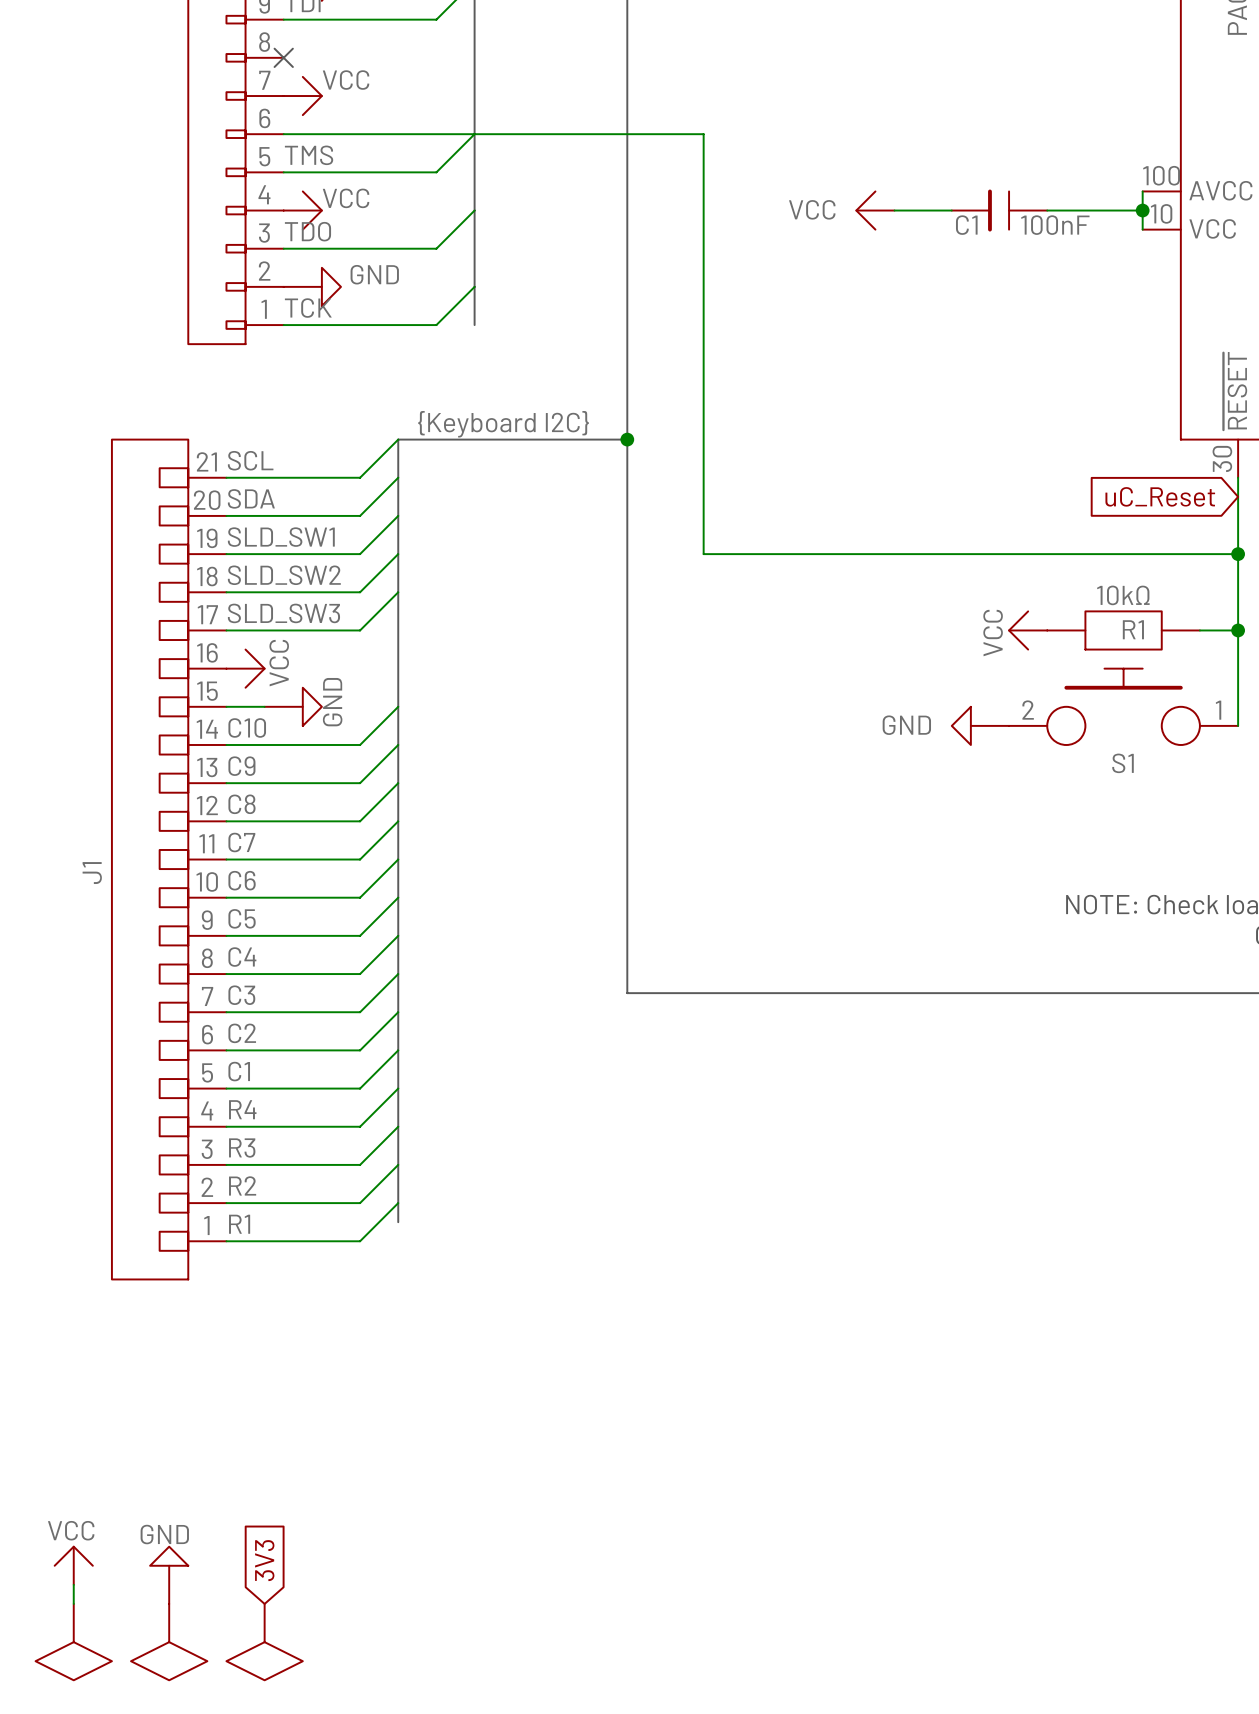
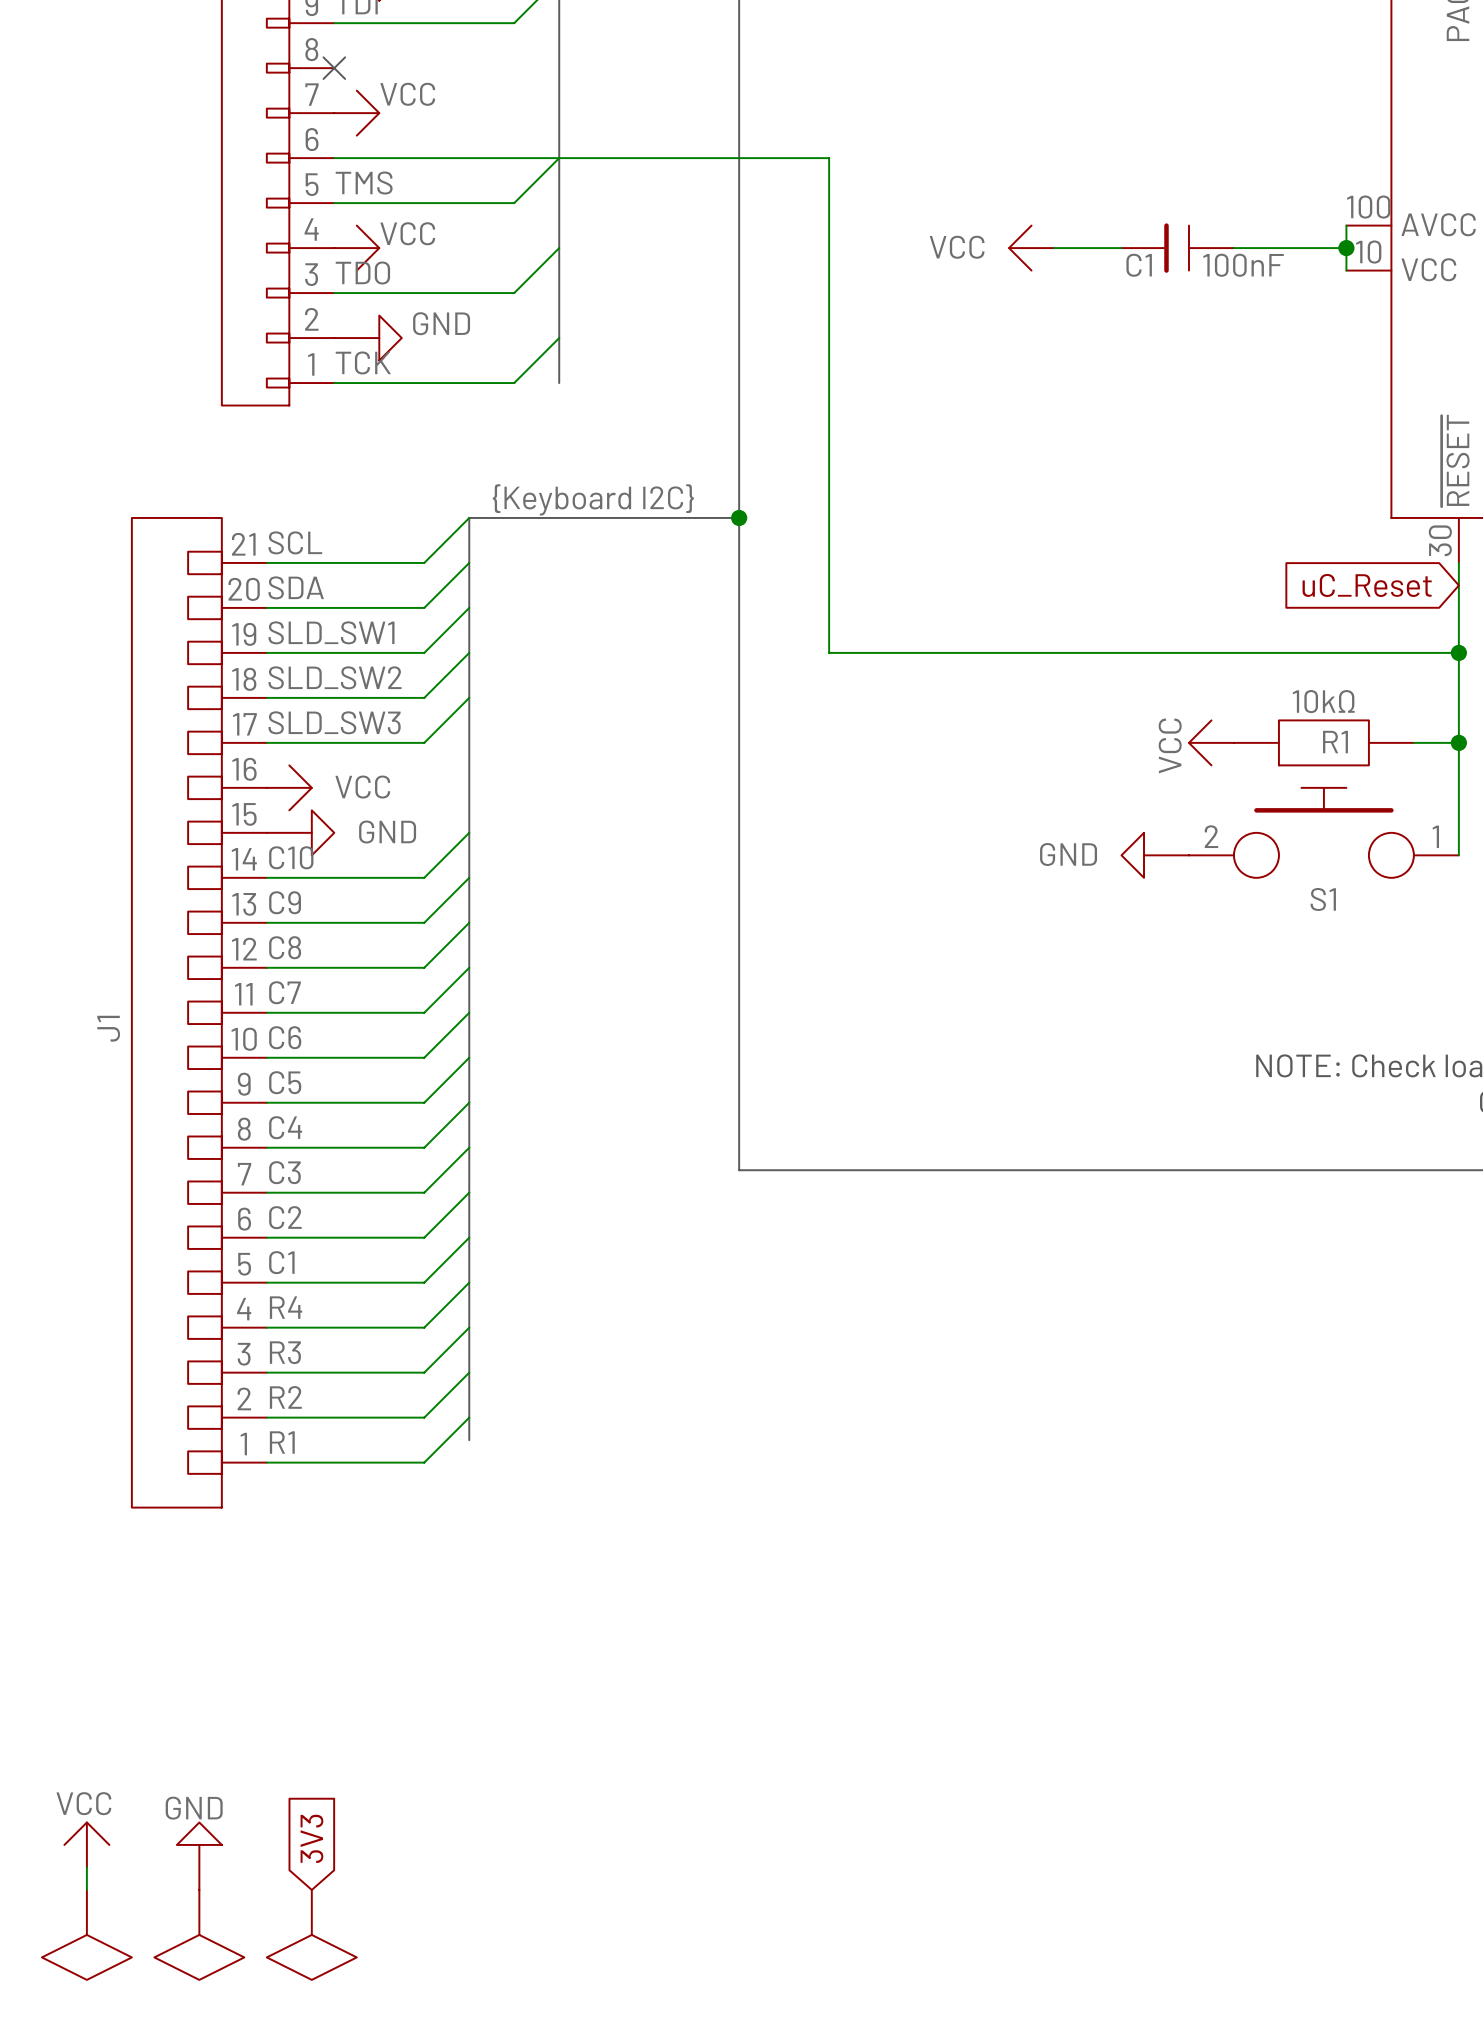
power symbol text rotation: 0° (279, 663) -> 90° clockwise (362, 787)
power symbol text rotation: 0° (332, 702) -> 90° clockwise (387, 832)
power symbol position: GND (293, 706) -> GND (300, 832)

